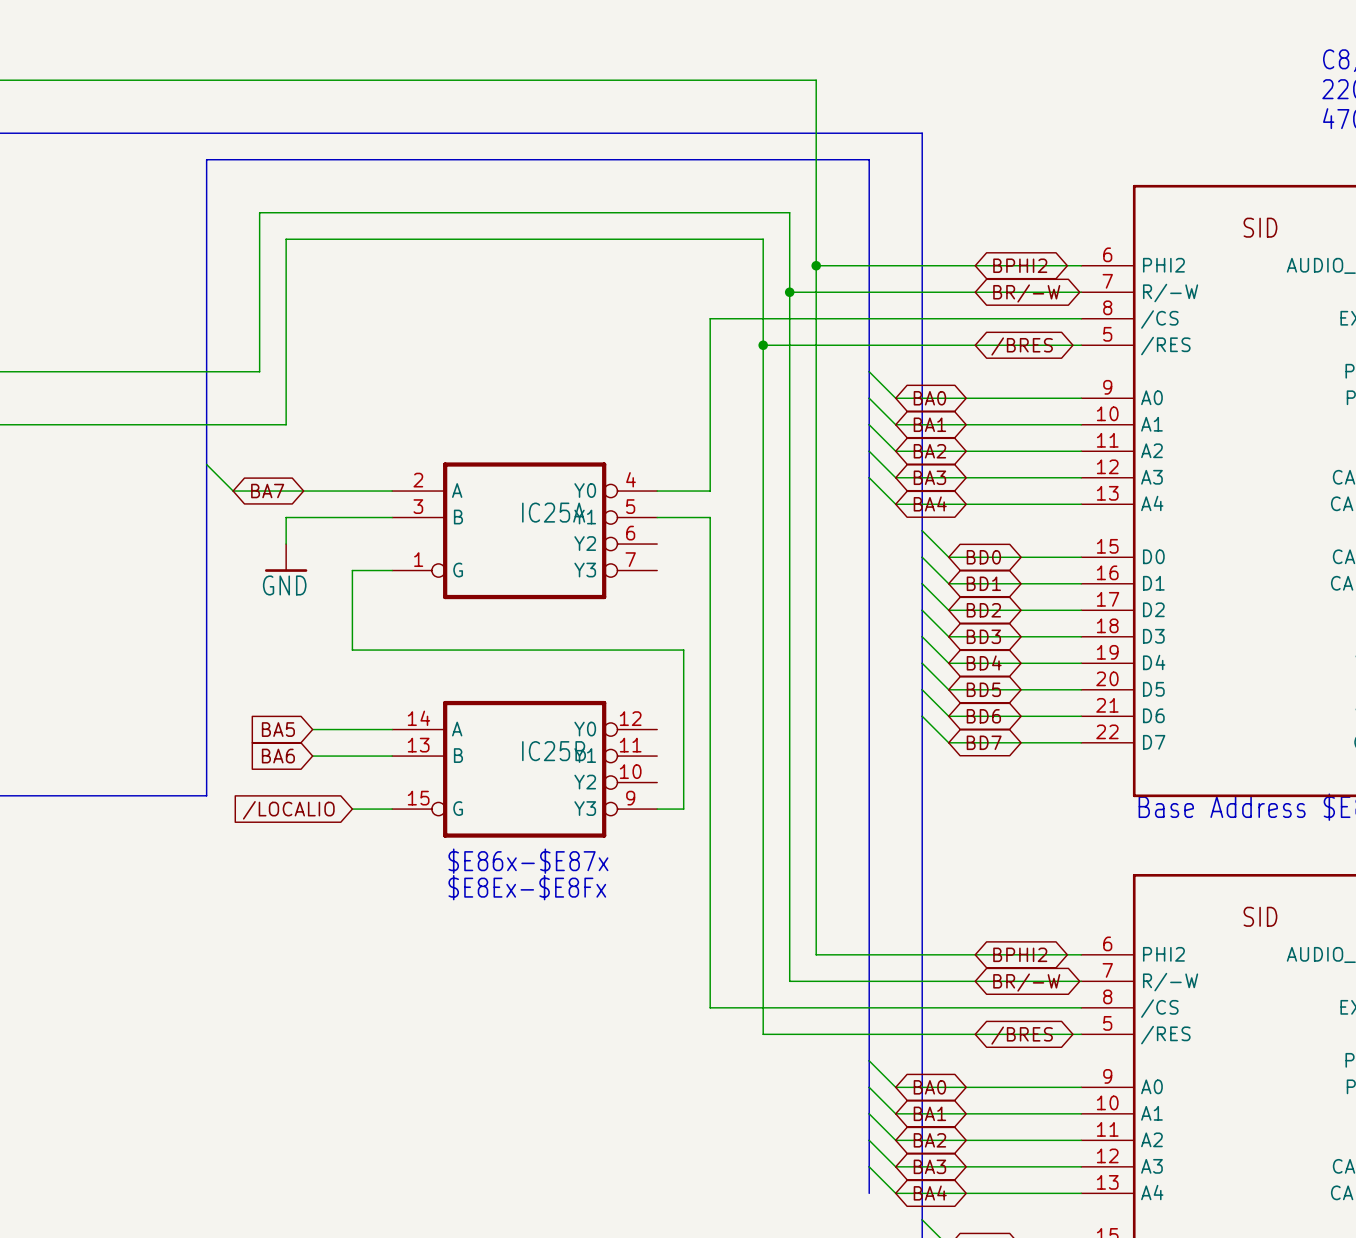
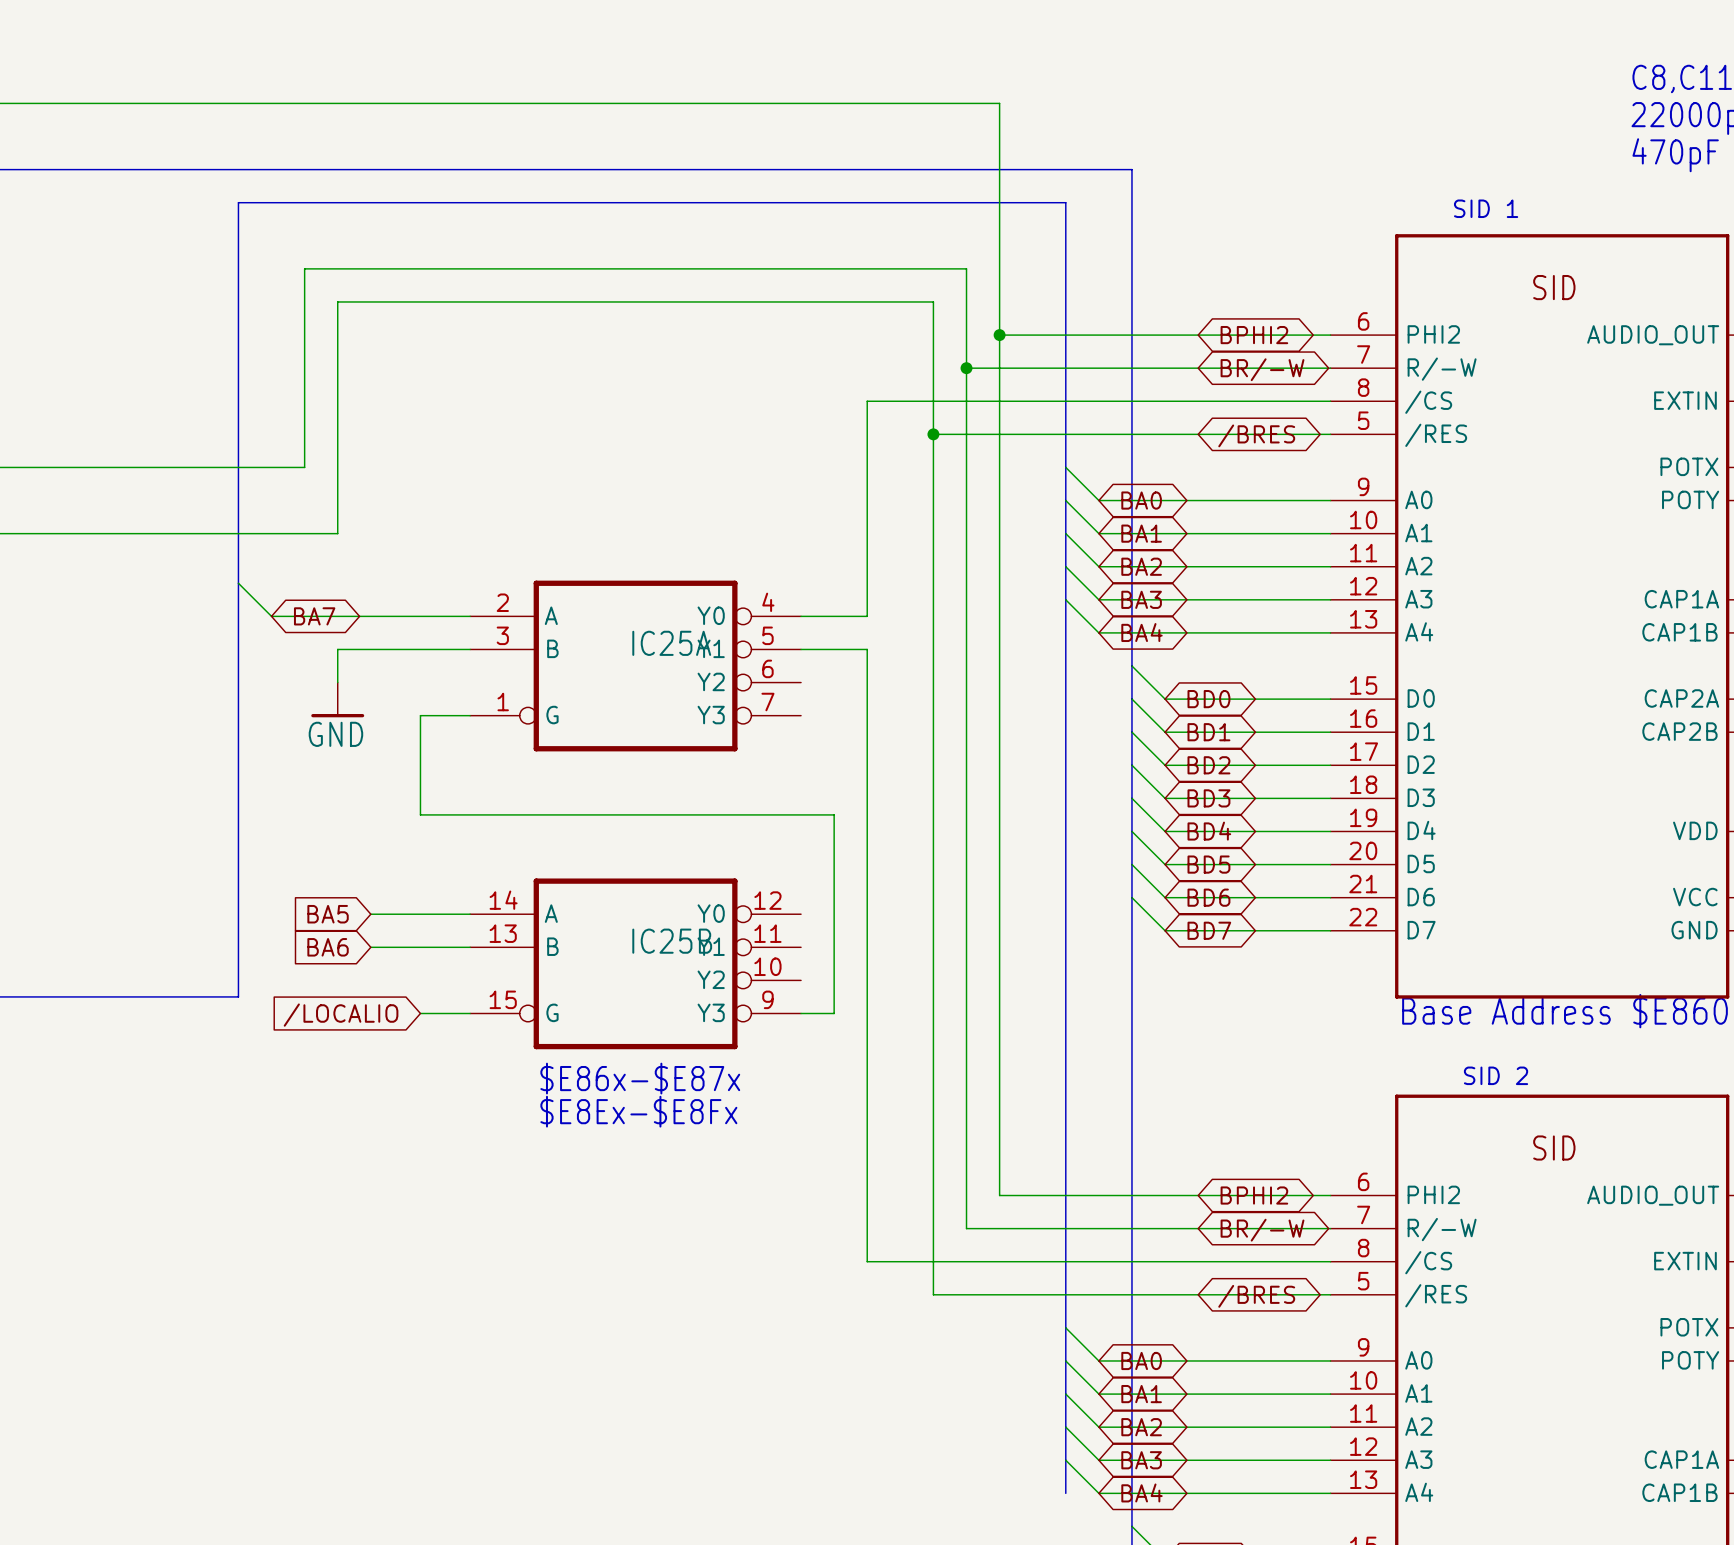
text: none -> SID 1 (1486, 208)
text: none -> SID 2 (1496, 1075)

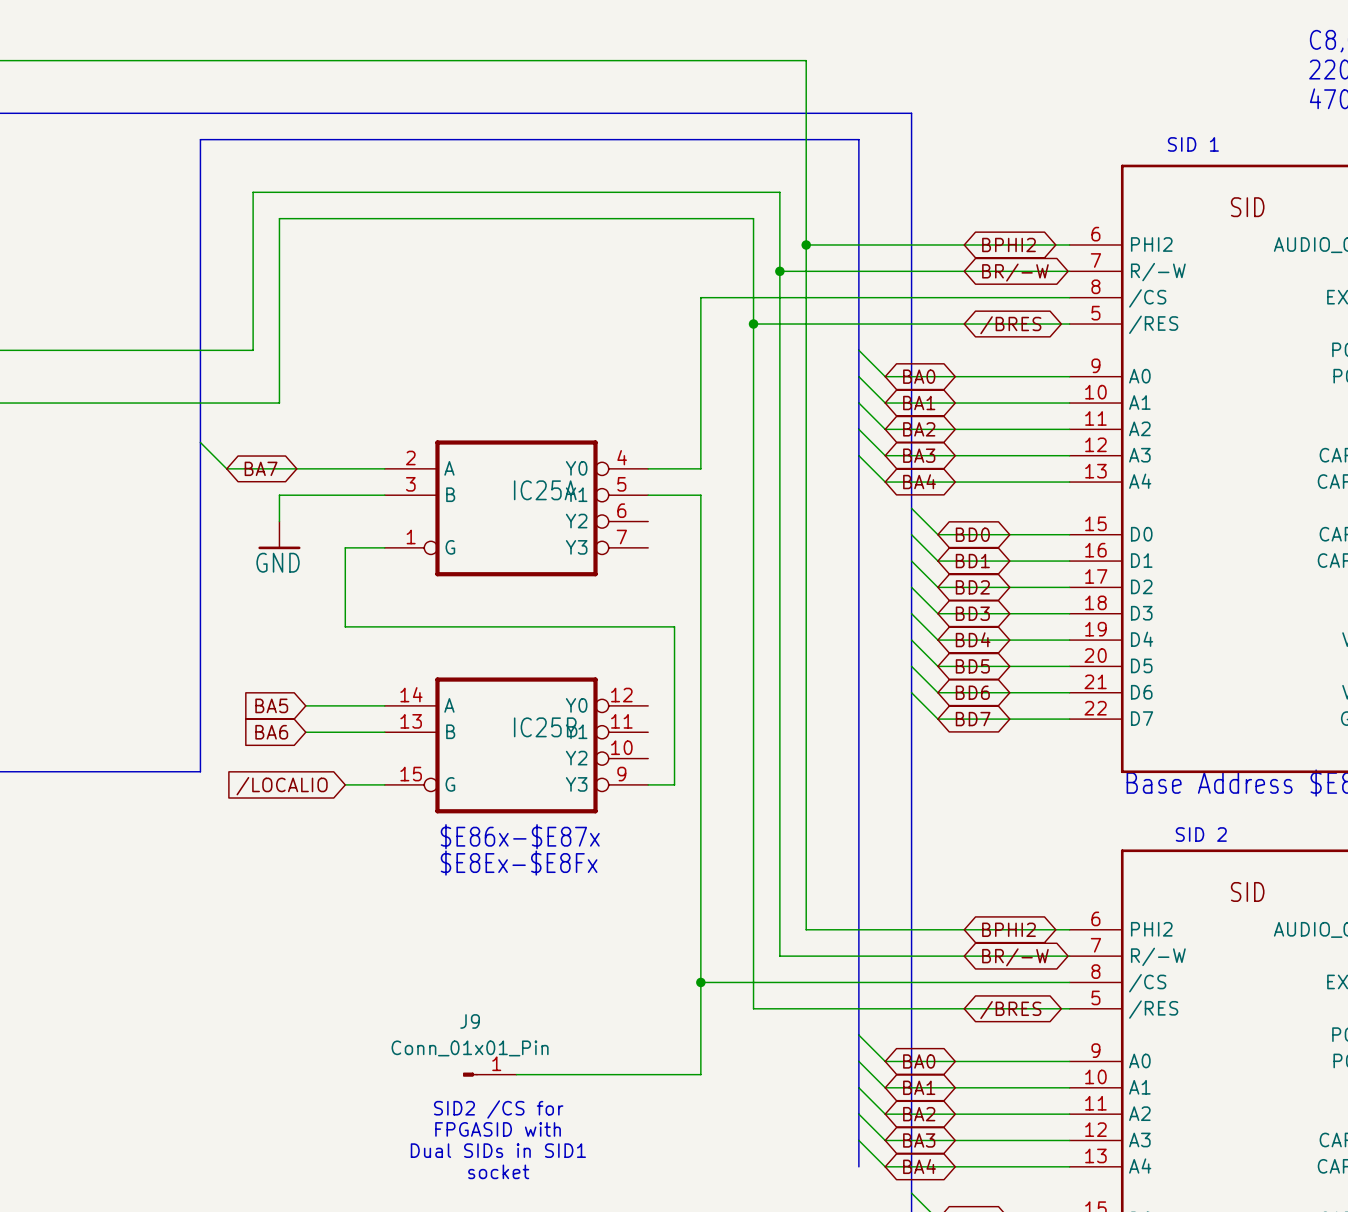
wire: none -> (700, 982) (700, 1074) (516, 1074)
junction: none -> (700, 982)
J9: none -> Conn_01x01_Pin (489, 1074)
text: none -> SID2 /CS for (498, 1109)
text: none -> FPGASID with (498, 1129)
text: none -> Dual SIDs in SID1 (498, 1150)
text: none -> socket (498, 1171)

